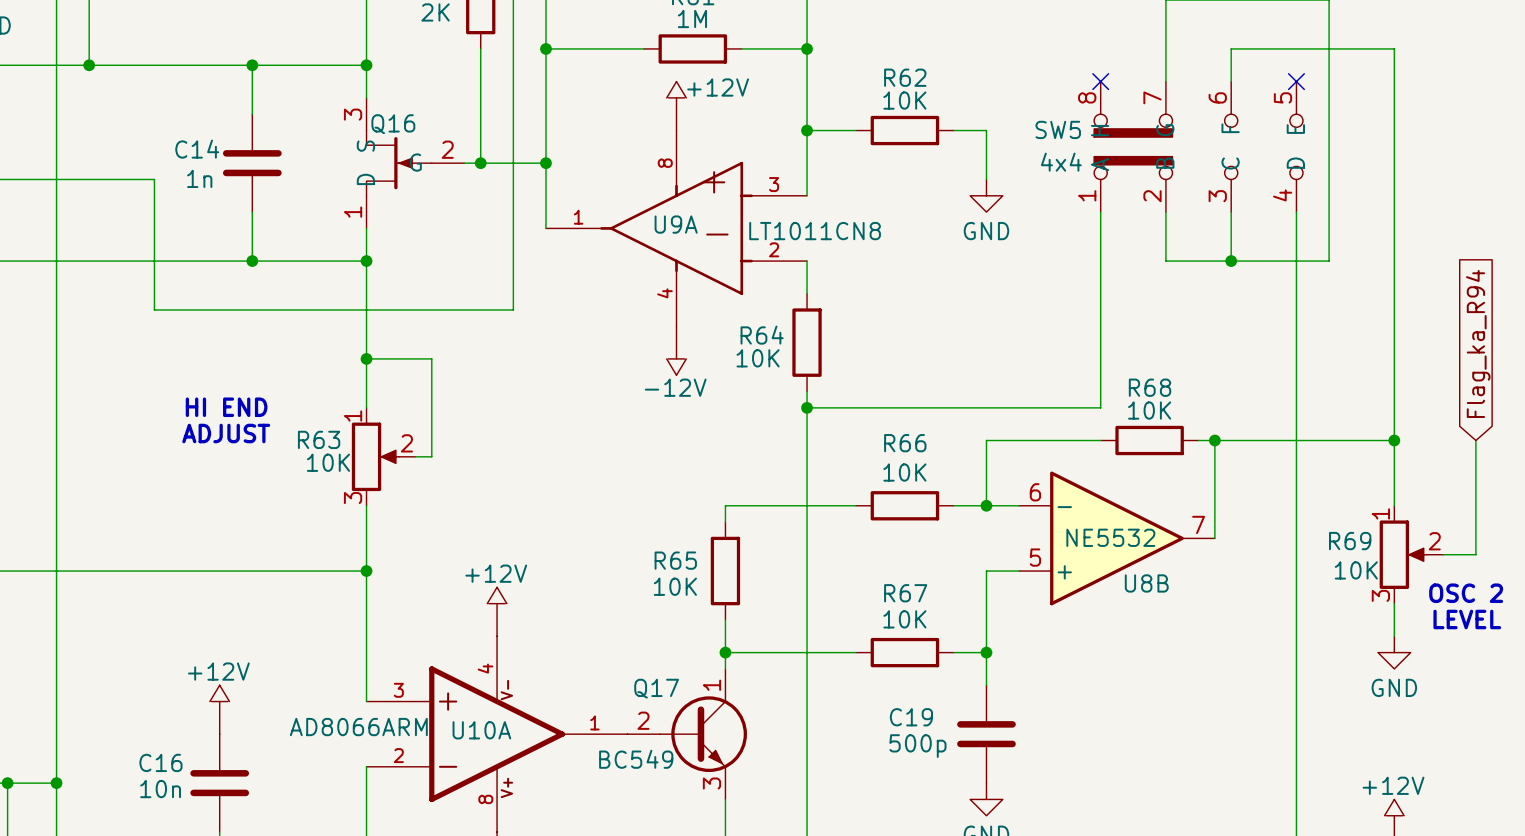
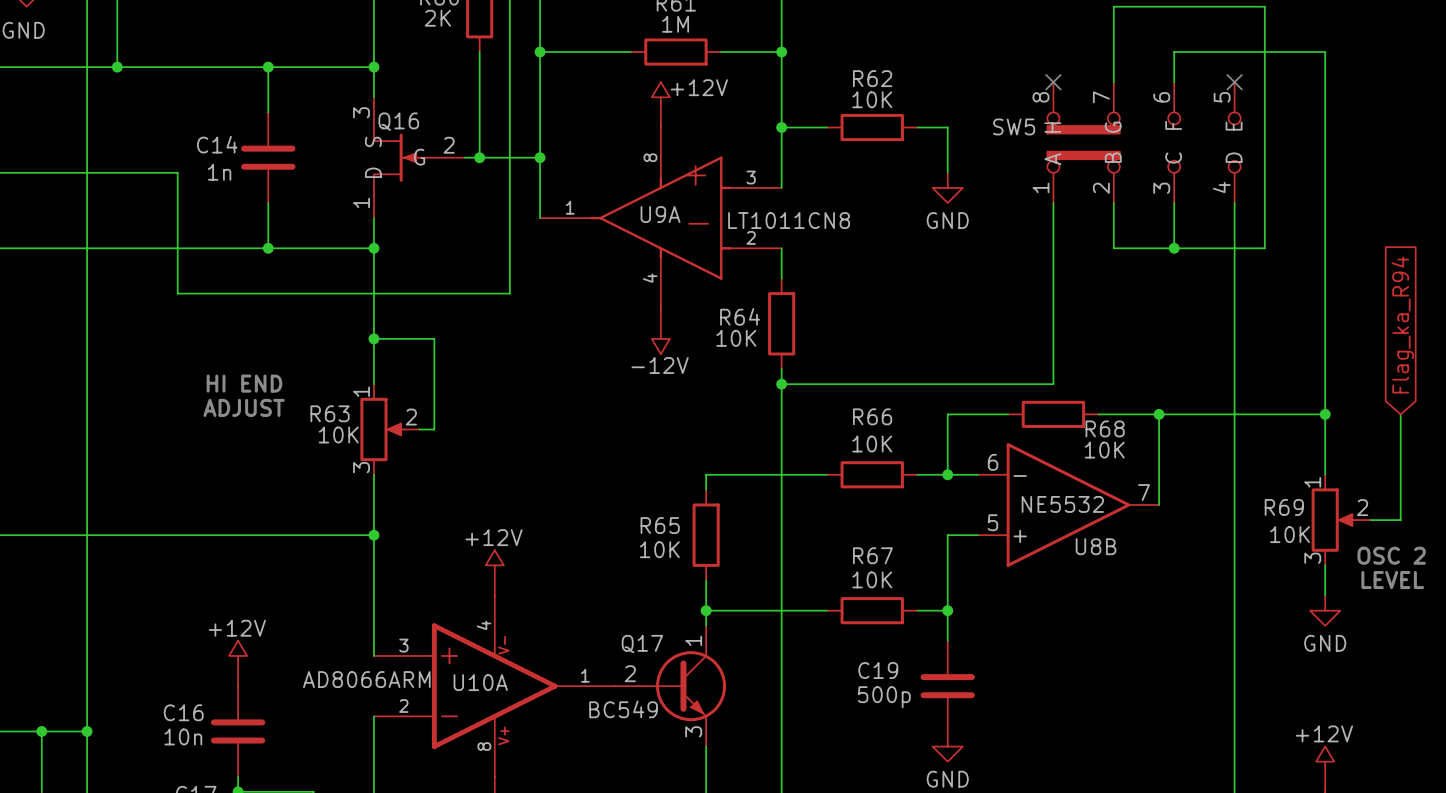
SW5 value: 4x4 (1061, 162) -> none
R68 name position: R68 (1150, 387) -> R68 (1105, 428)
R68 value position: 10K (1149, 410) -> 10K (1104, 450)
wire: (1051, 440) (1100, 440) -> (1098, 414) (1144, 414)
R68 position: (1149, 440) -> (1053, 414)

